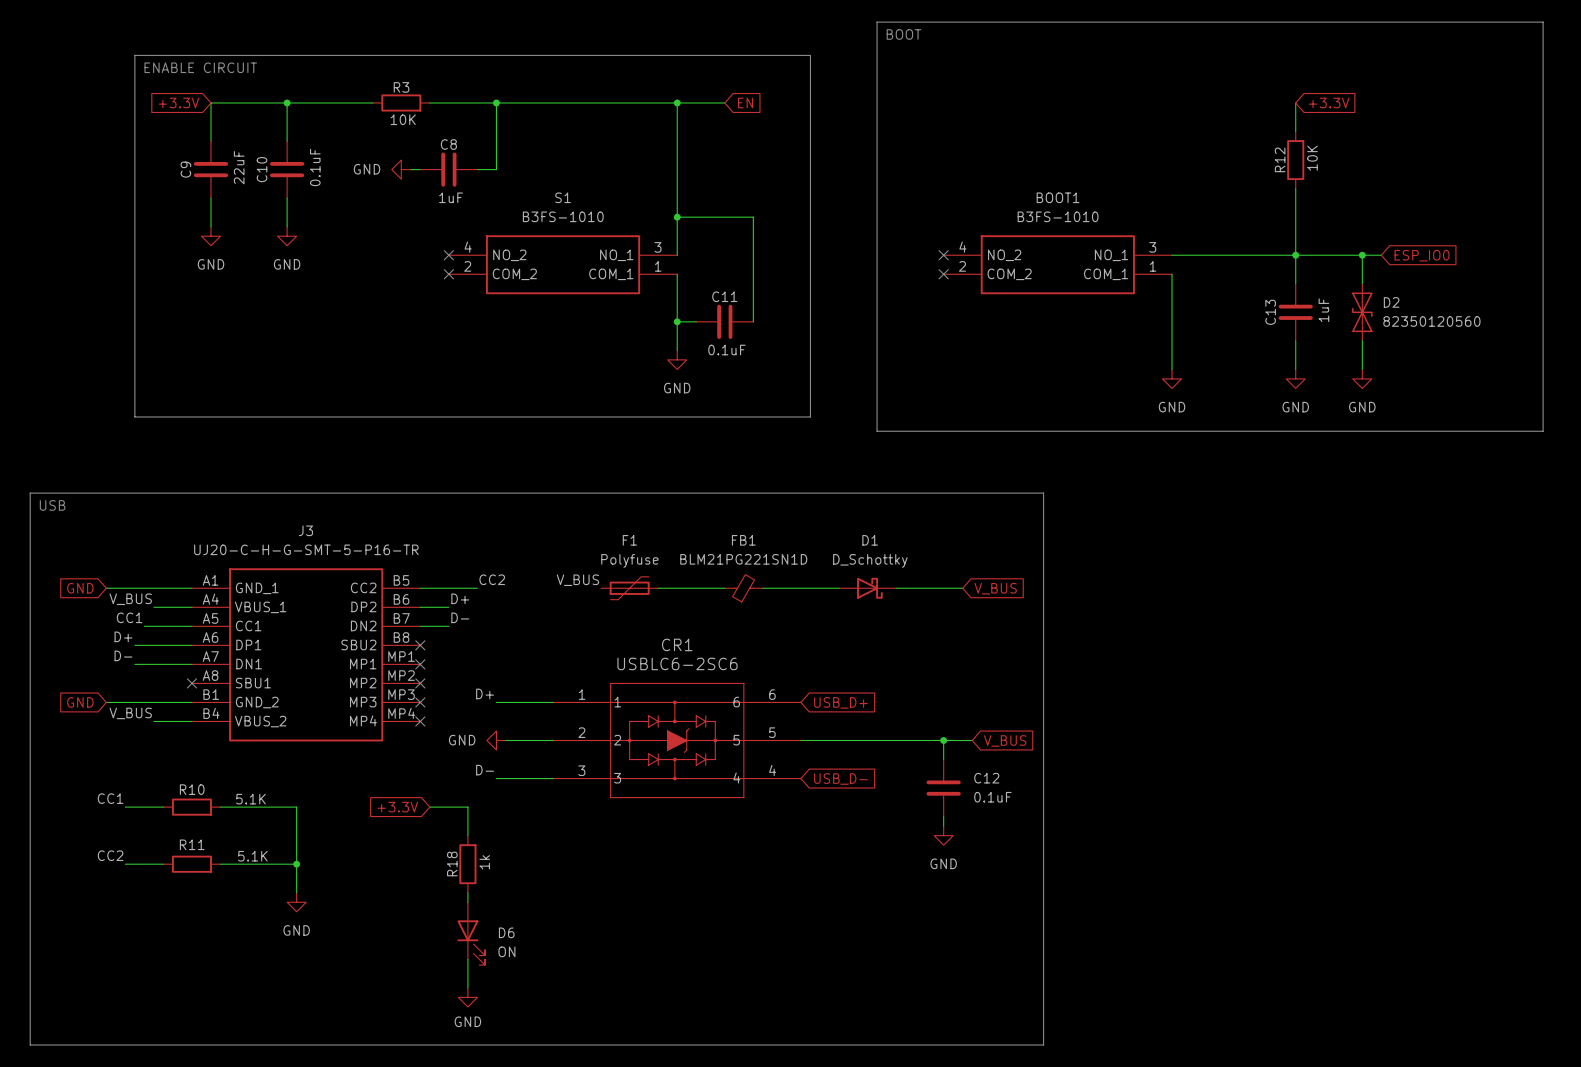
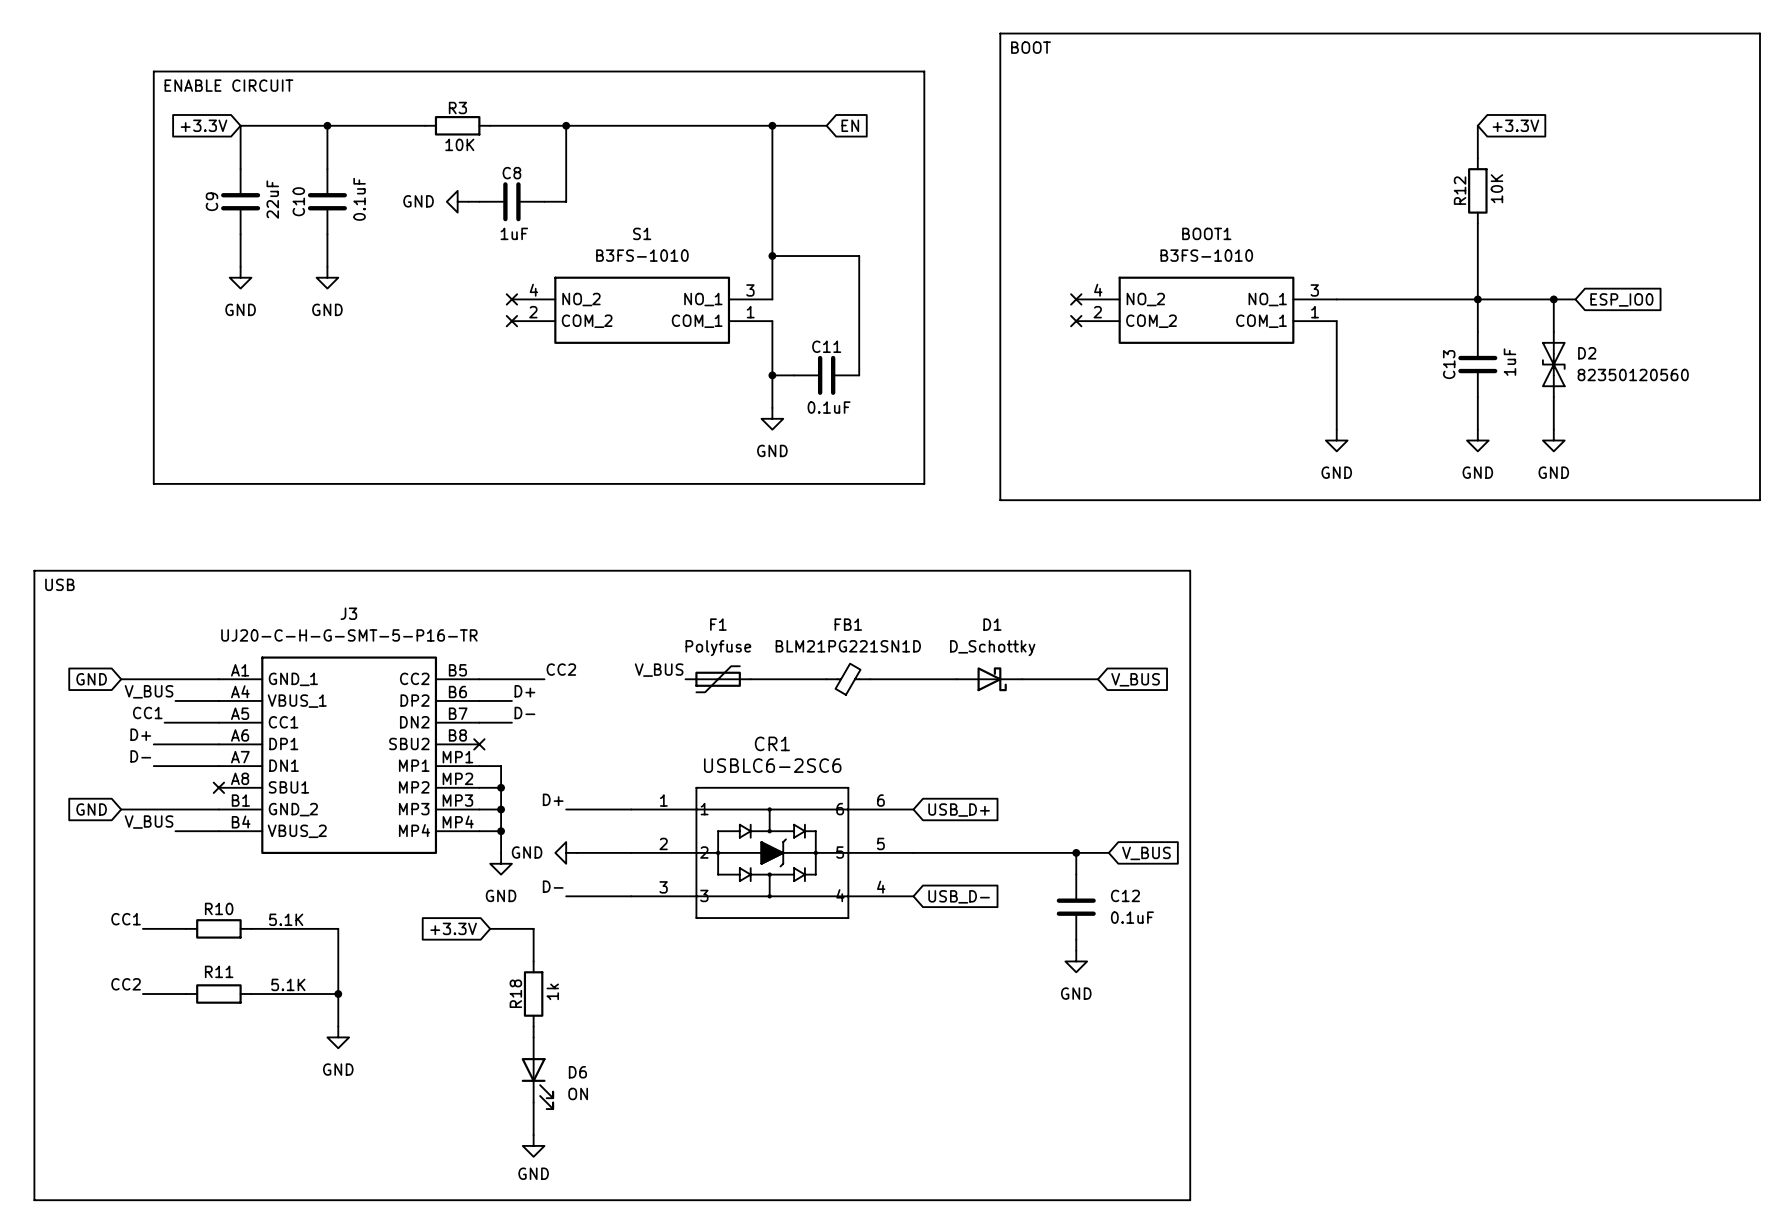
wire: none -> (479, 766) (501, 766) (501, 852)
no-connect mark: (420, 664) -> none
wire: none -> (479, 787) (501, 787)
no-connect mark: (420, 683) -> none
junction: none -> (501, 787)
wire: none -> (479, 809) (501, 809)
no-connect mark: (420, 702) -> none
junction: none -> (501, 809)
wire: none -> (479, 831) (501, 831)
no-connect mark: (420, 721) -> none
junction: none -> (501, 831)
power symbol: none -> GND (501, 863)

